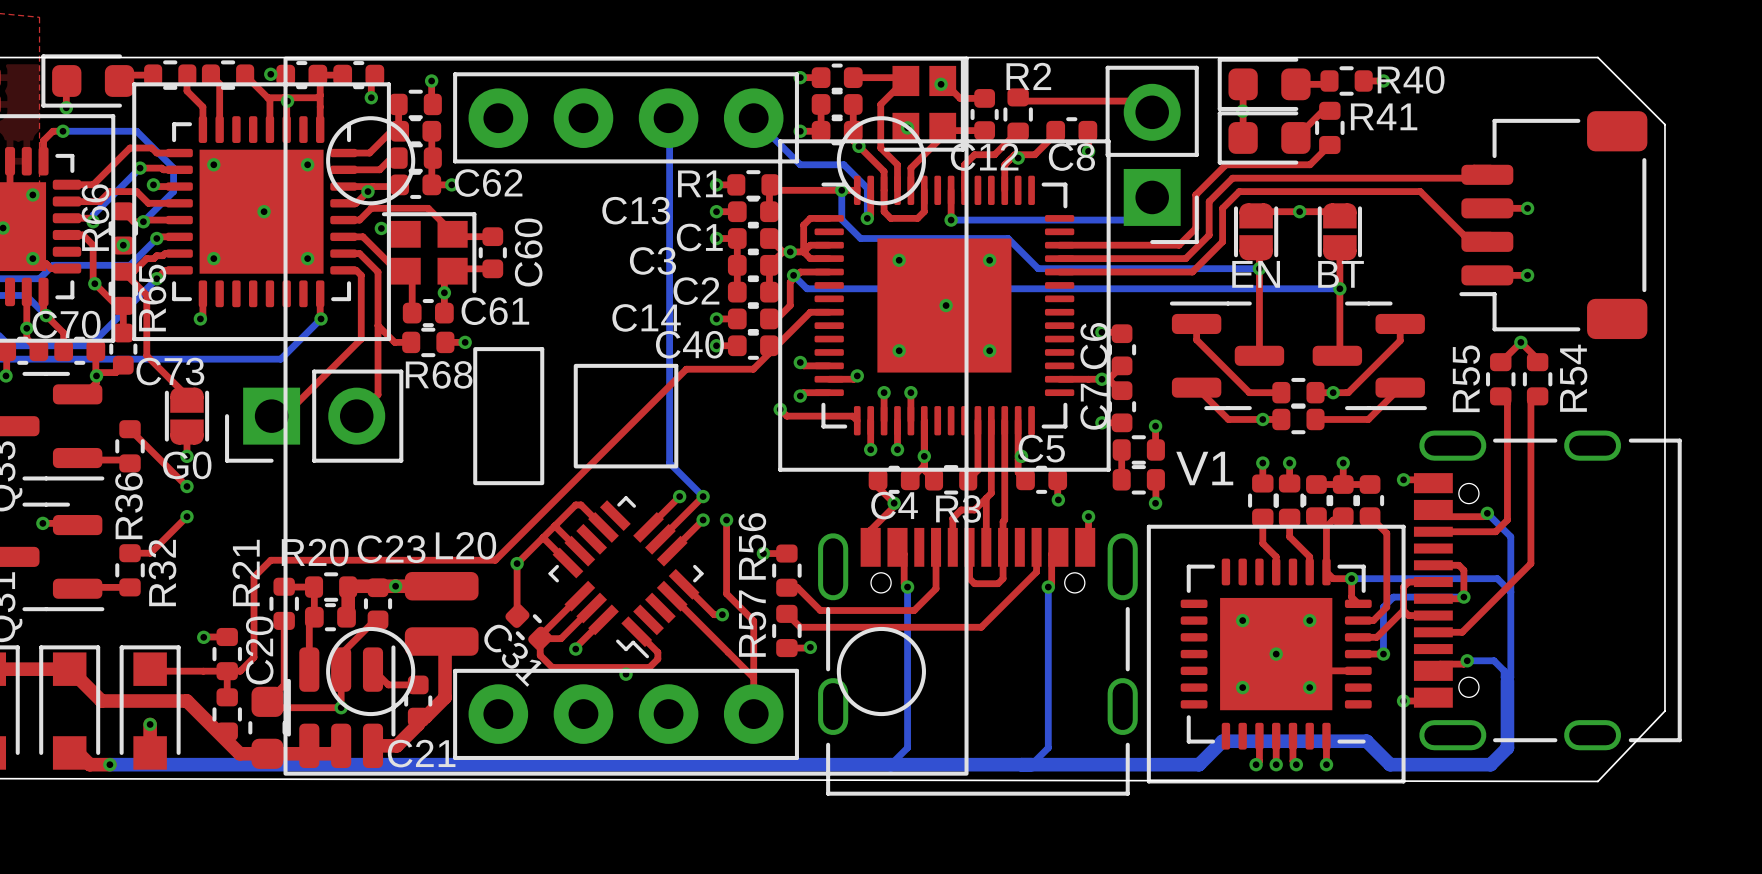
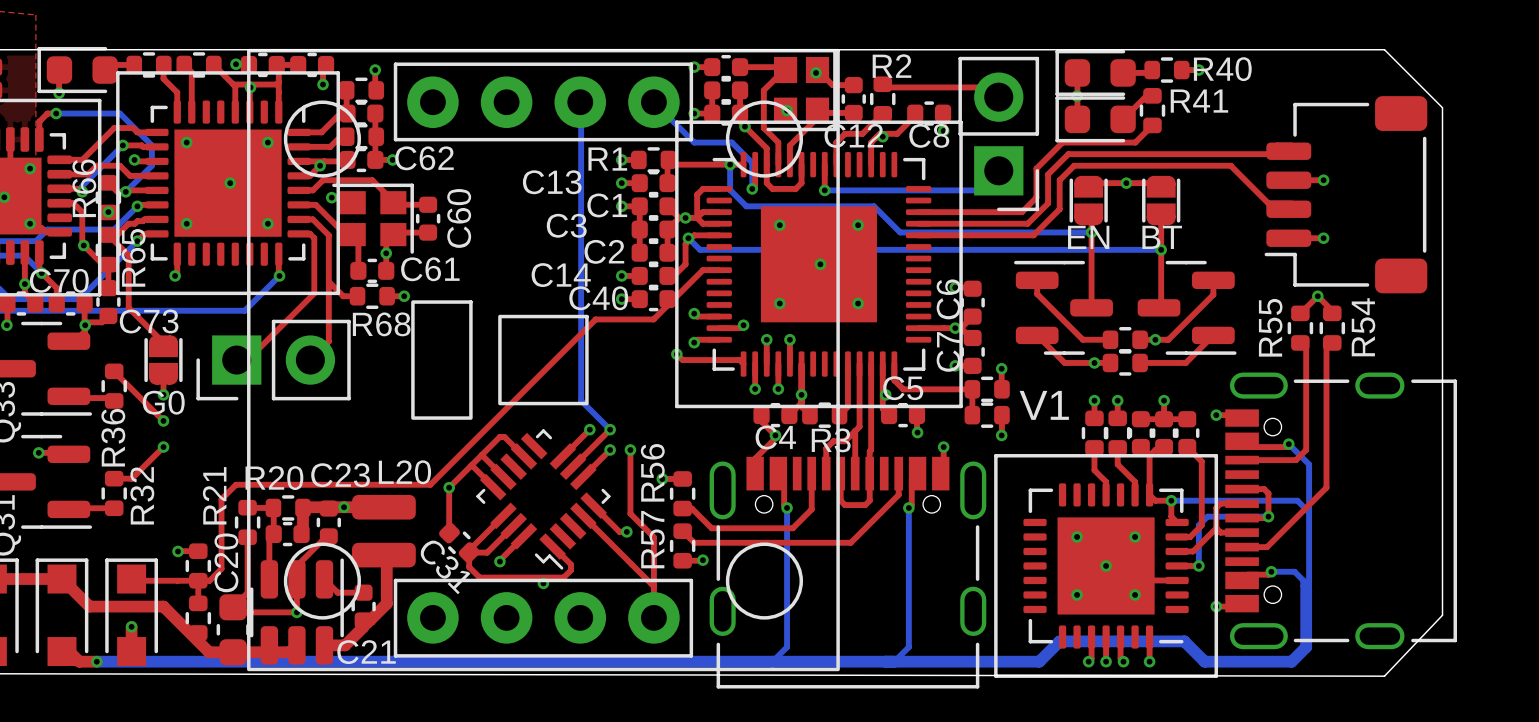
top track: none -> (894, 364) (894, 380) (903, 389) (972, 389)

